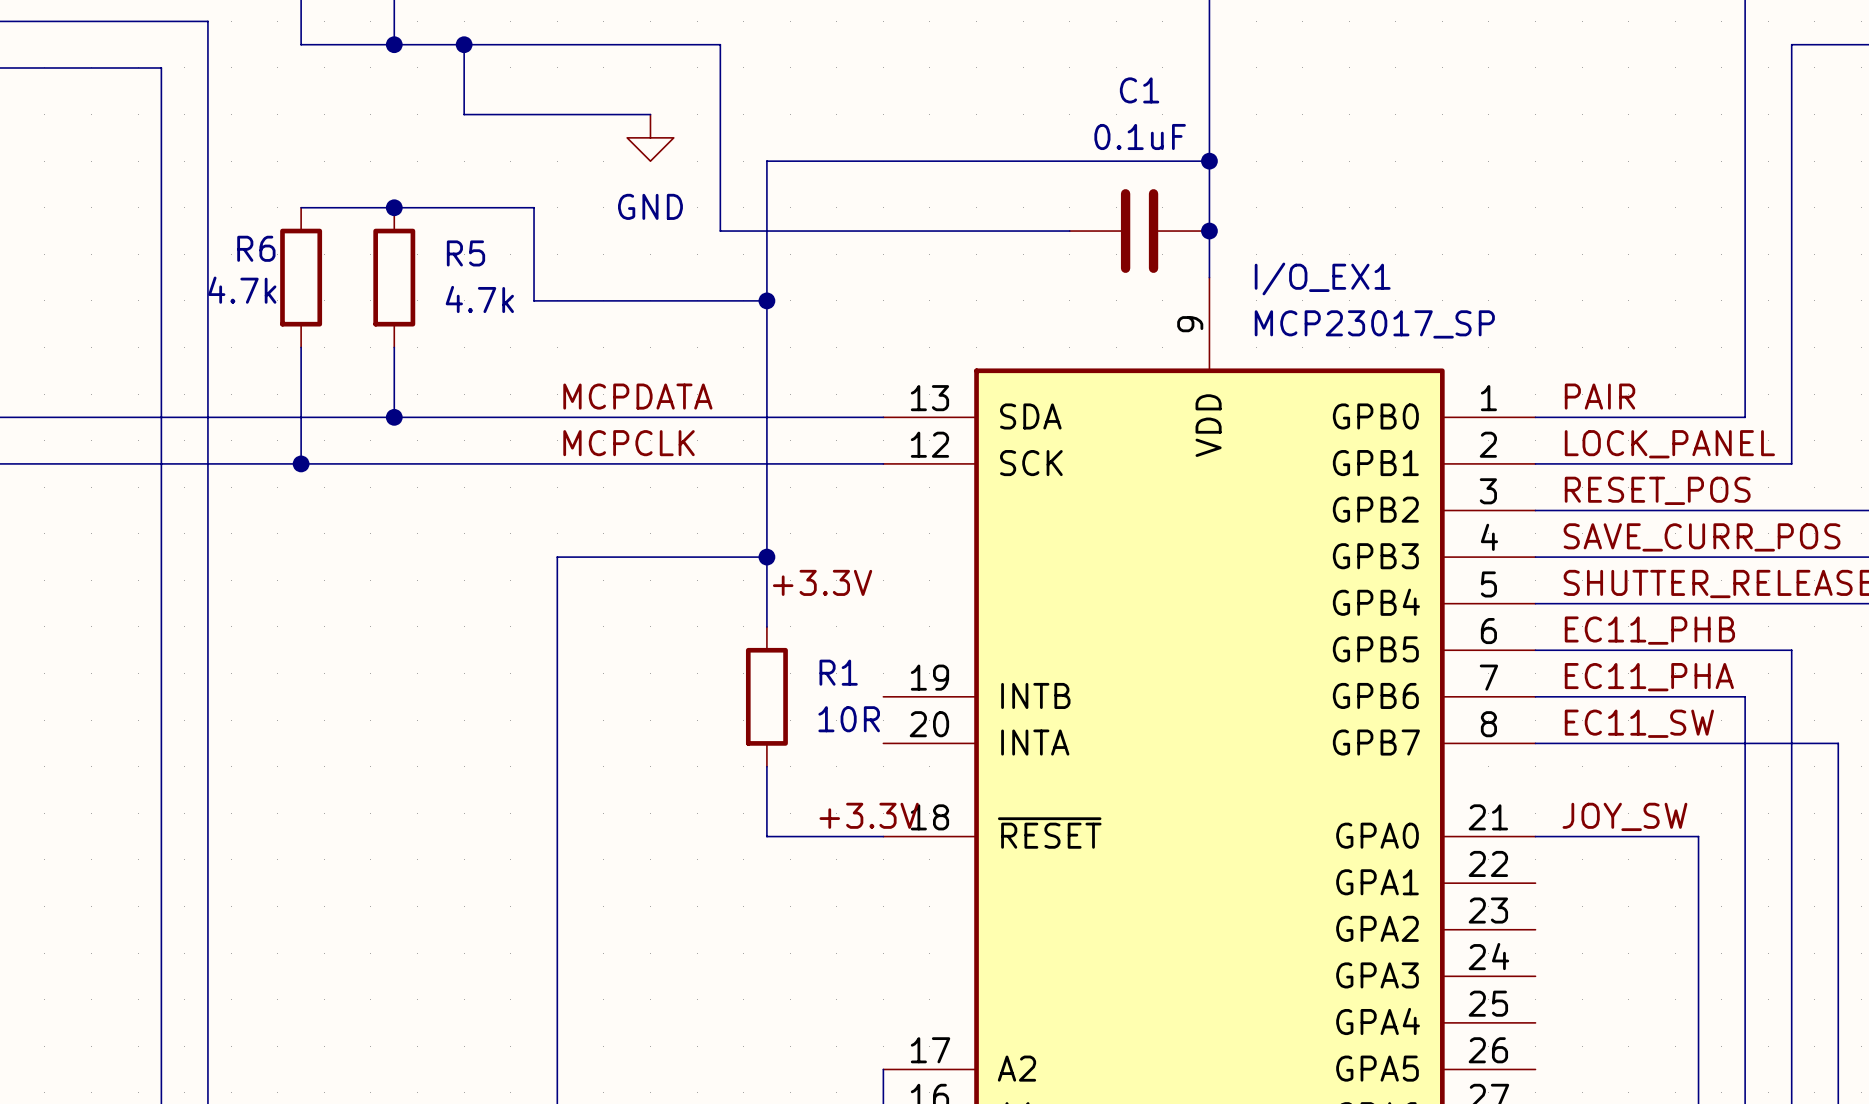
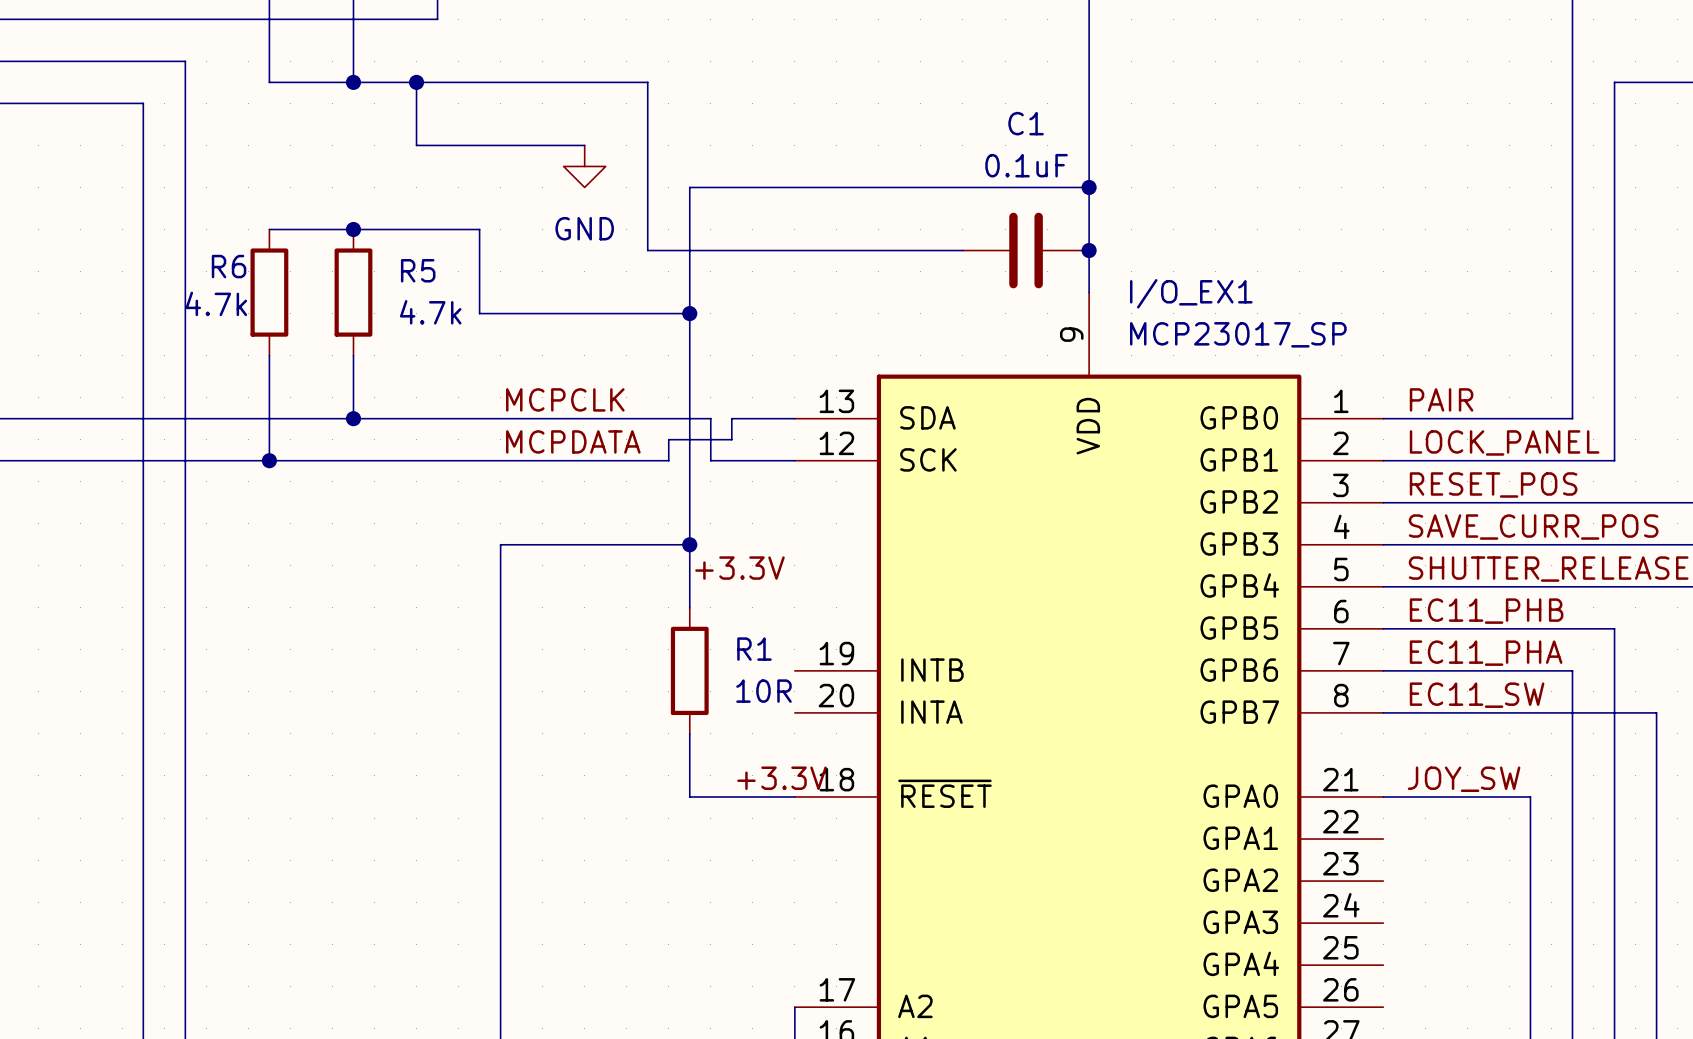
label: MCPDATA (637, 396) -> MCPCLK (565, 399)
wire: (790, 417) (813, 417) -> (710, 418) (710, 460)
label: MCPCLK (629, 443) -> MCPDATA (573, 441)
wire: (743, 463) (790, 463) -> (668, 460) (668, 439) (731, 439) (731, 418)

